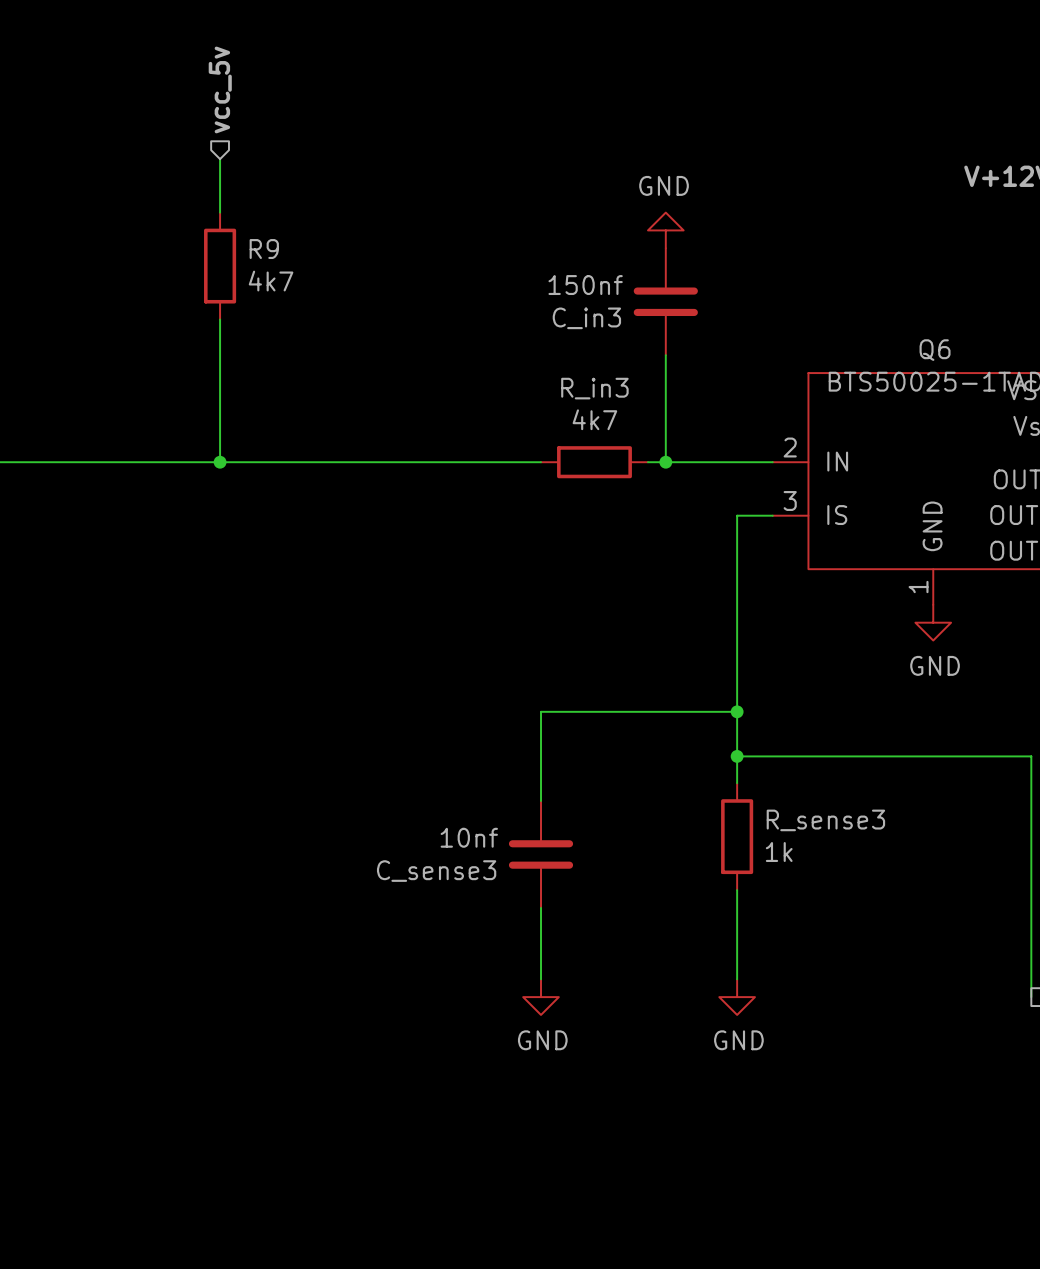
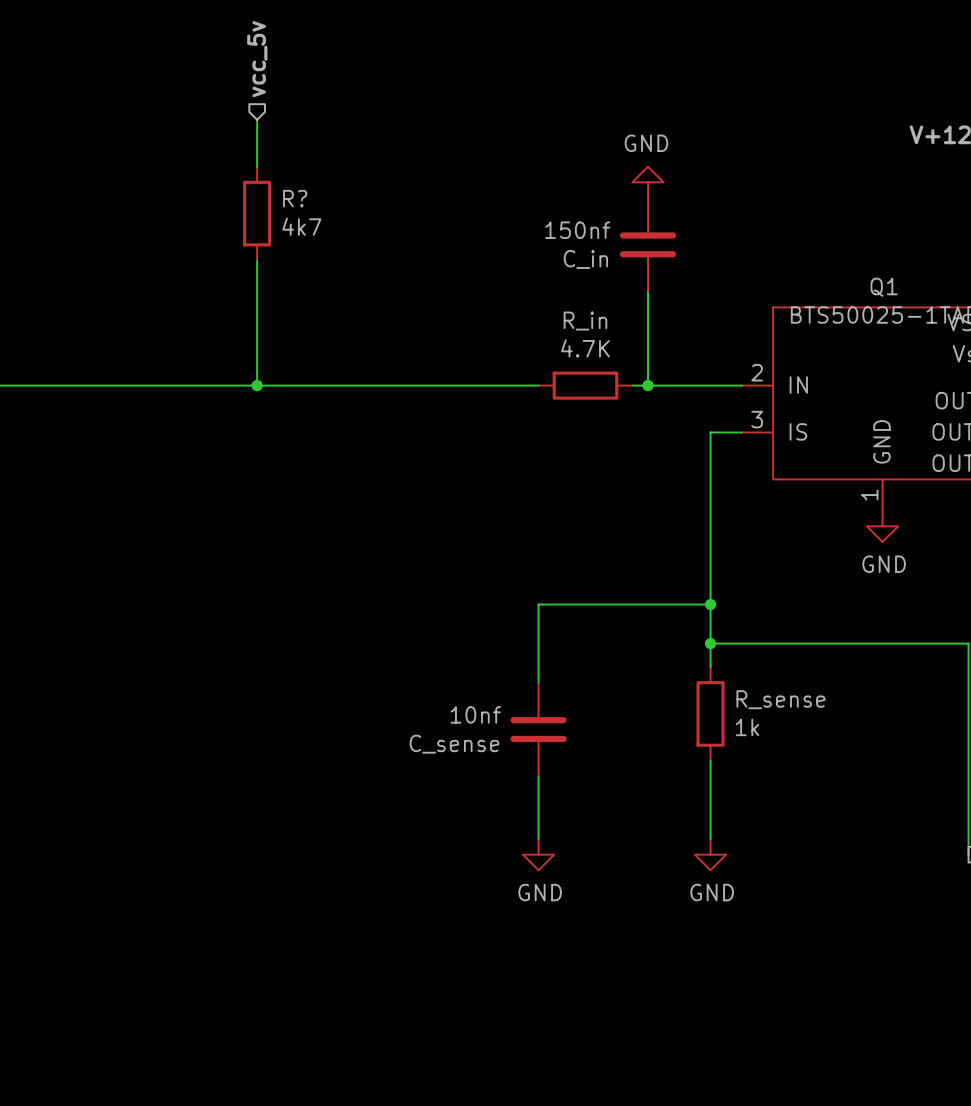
R9 name: R9 (264, 249) -> R? (295, 198)
C_in3 name: C_in3 (586, 318) -> C_in (585, 259)
Q6 name: Q6 (935, 350) -> Q1 (884, 287)
R_in3 name: R_in3 (594, 388) -> R_in (585, 321)
R_in3 value: 4k7 (594, 419) -> 4.7K (585, 348)
R_sense3 name: R_sense3 (825, 820) -> R_sense (780, 699)
C_sense3 name: C_sense3 (436, 871) -> C_sense (454, 744)

